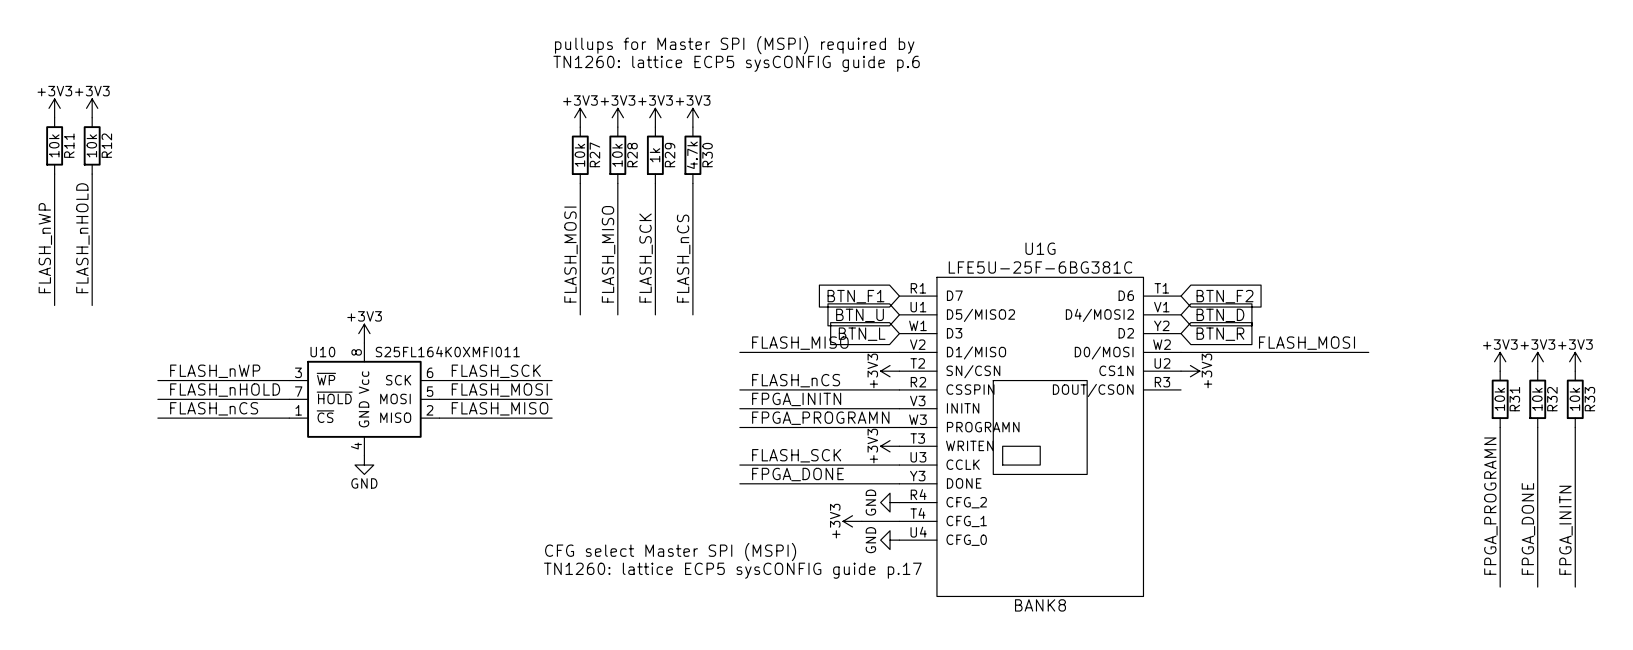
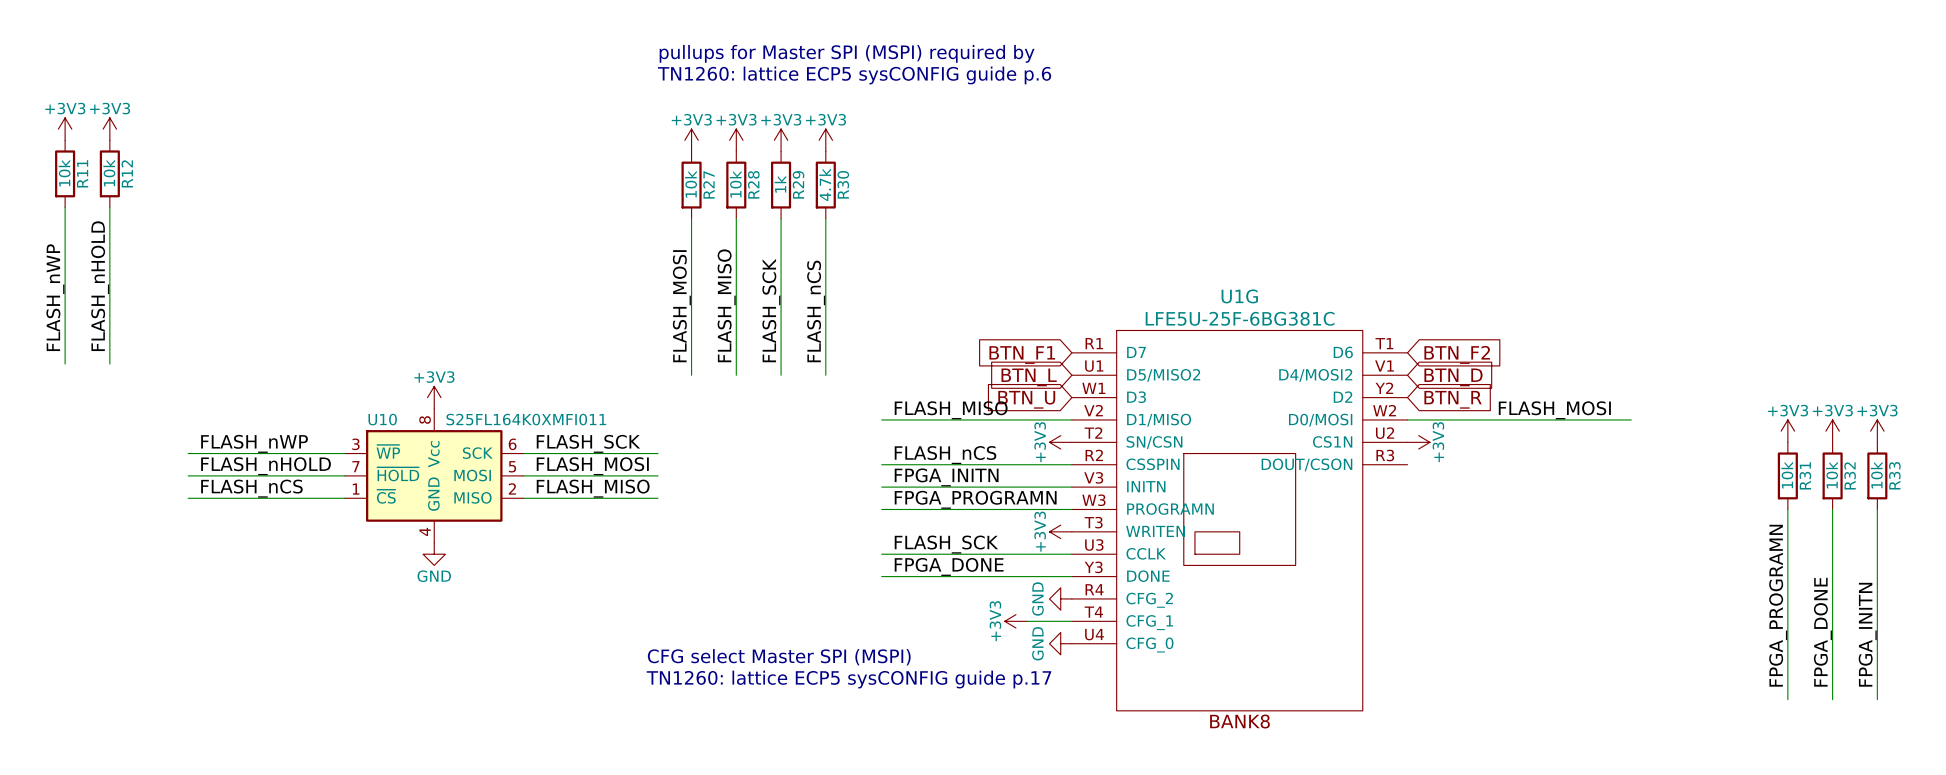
global label: BTN_U (859, 315) -> BTN_L (1029, 377)
global label: BTN_L (862, 334) -> BTN_U (1026, 399)

